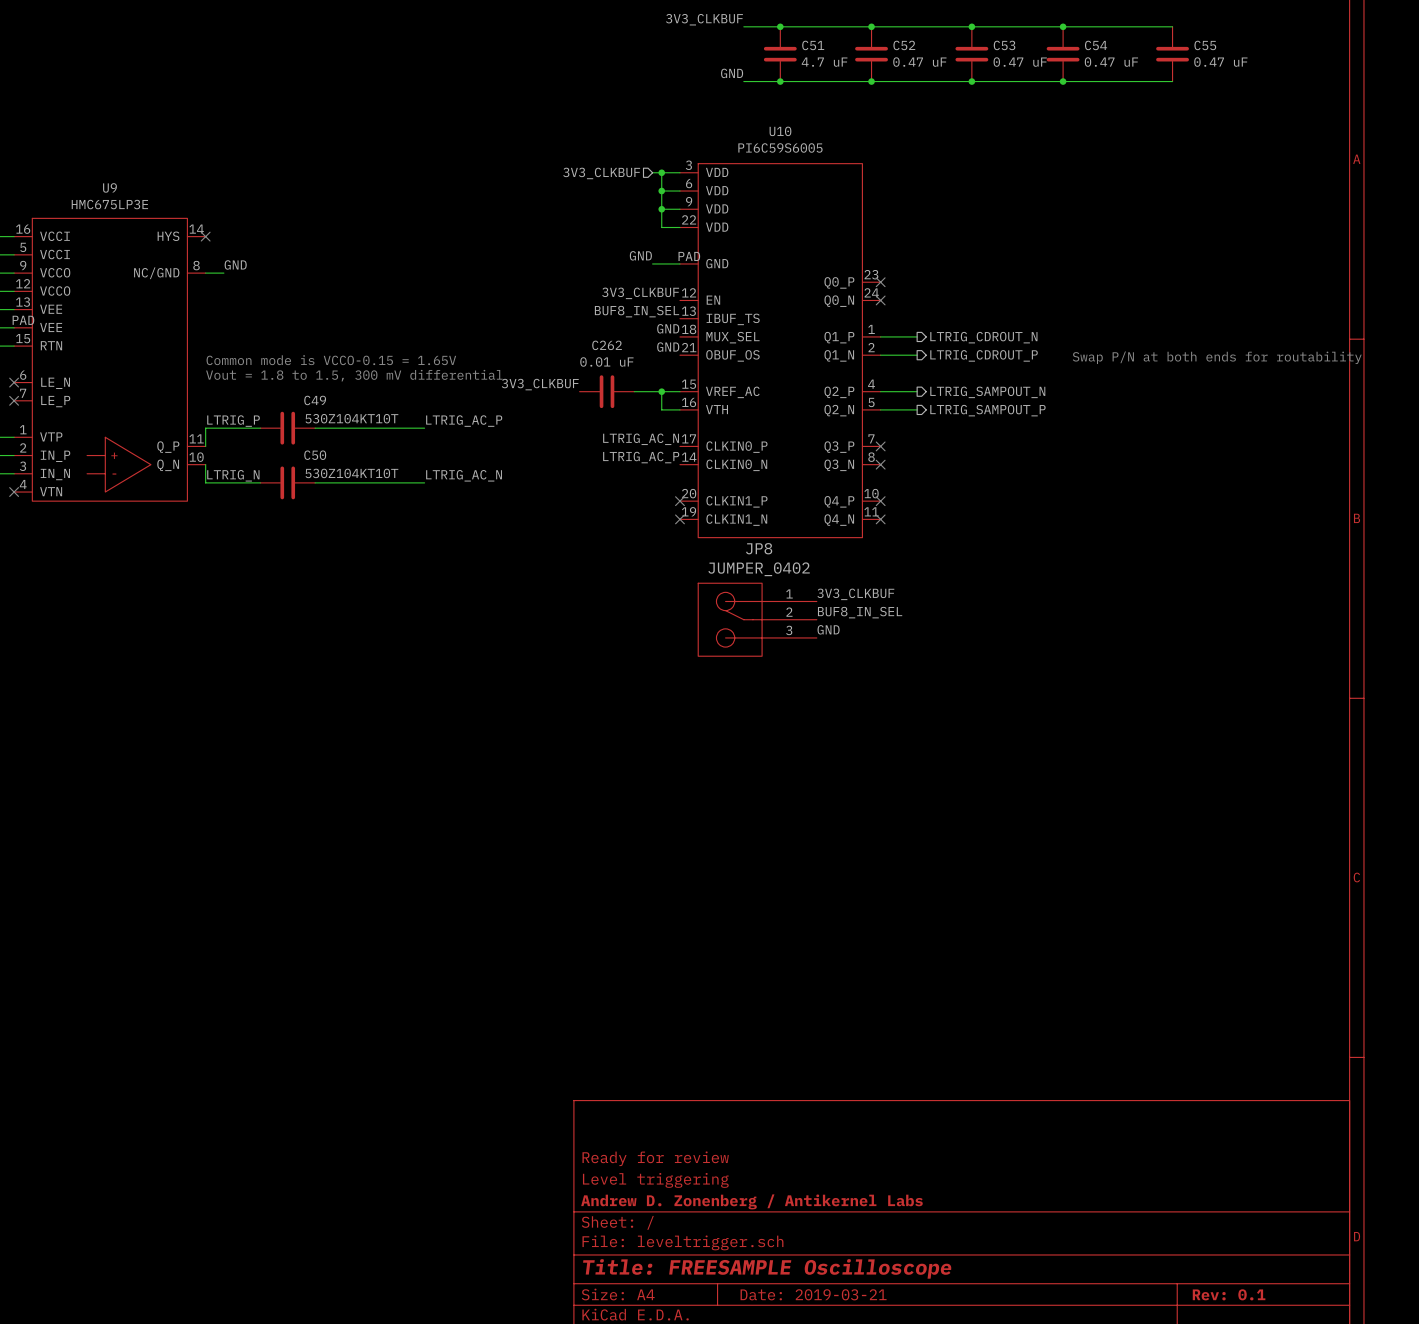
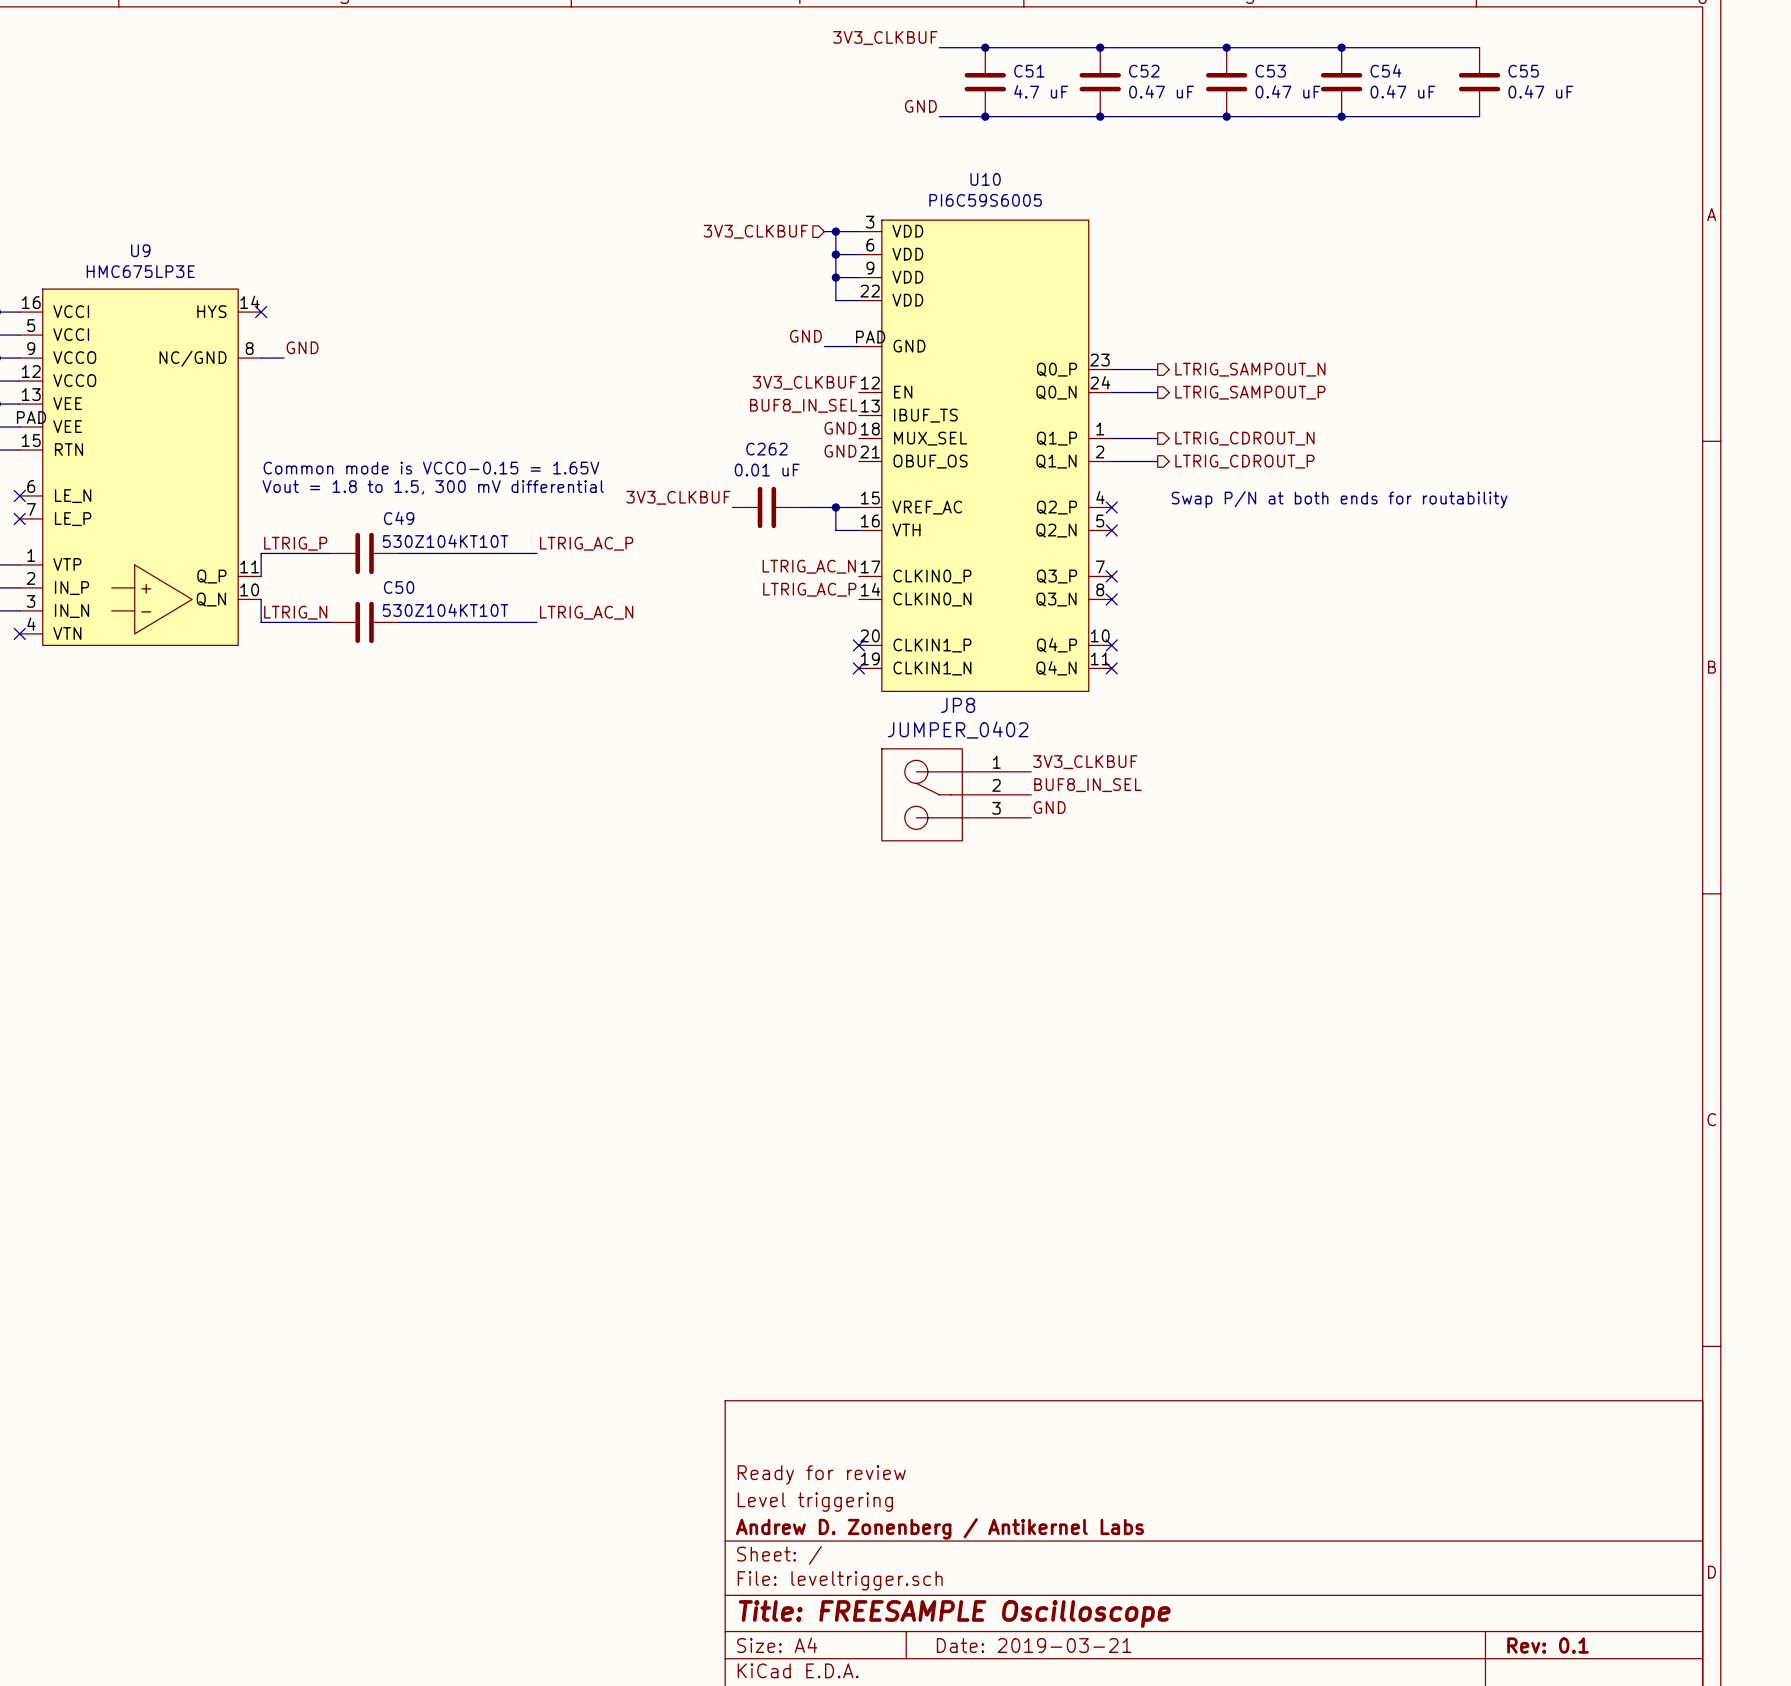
no-connect mark: (880, 282) -> none
no-connect mark: (880, 300) -> none
text position: Swap P/N at both ends for routability (1217, 357) -> Swap P/N at both ends for routability (1339, 499)
wire: (880, 391) (917, 391) -> (1111, 392) (1157, 392)
no-connect mark: none -> (1111, 507)
hierarchical label position: LTRIG_SAMPOUT_N (987, 392) -> LTRIG_SAMPOUT_N (1250, 369)
wire: (880, 409) (917, 409) -> (1111, 369) (1157, 369)
no-connect mark: none -> (1111, 530)
hierarchical label position: LTRIG_SAMPOUT_P (987, 410) -> LTRIG_SAMPOUT_P (1250, 392)

